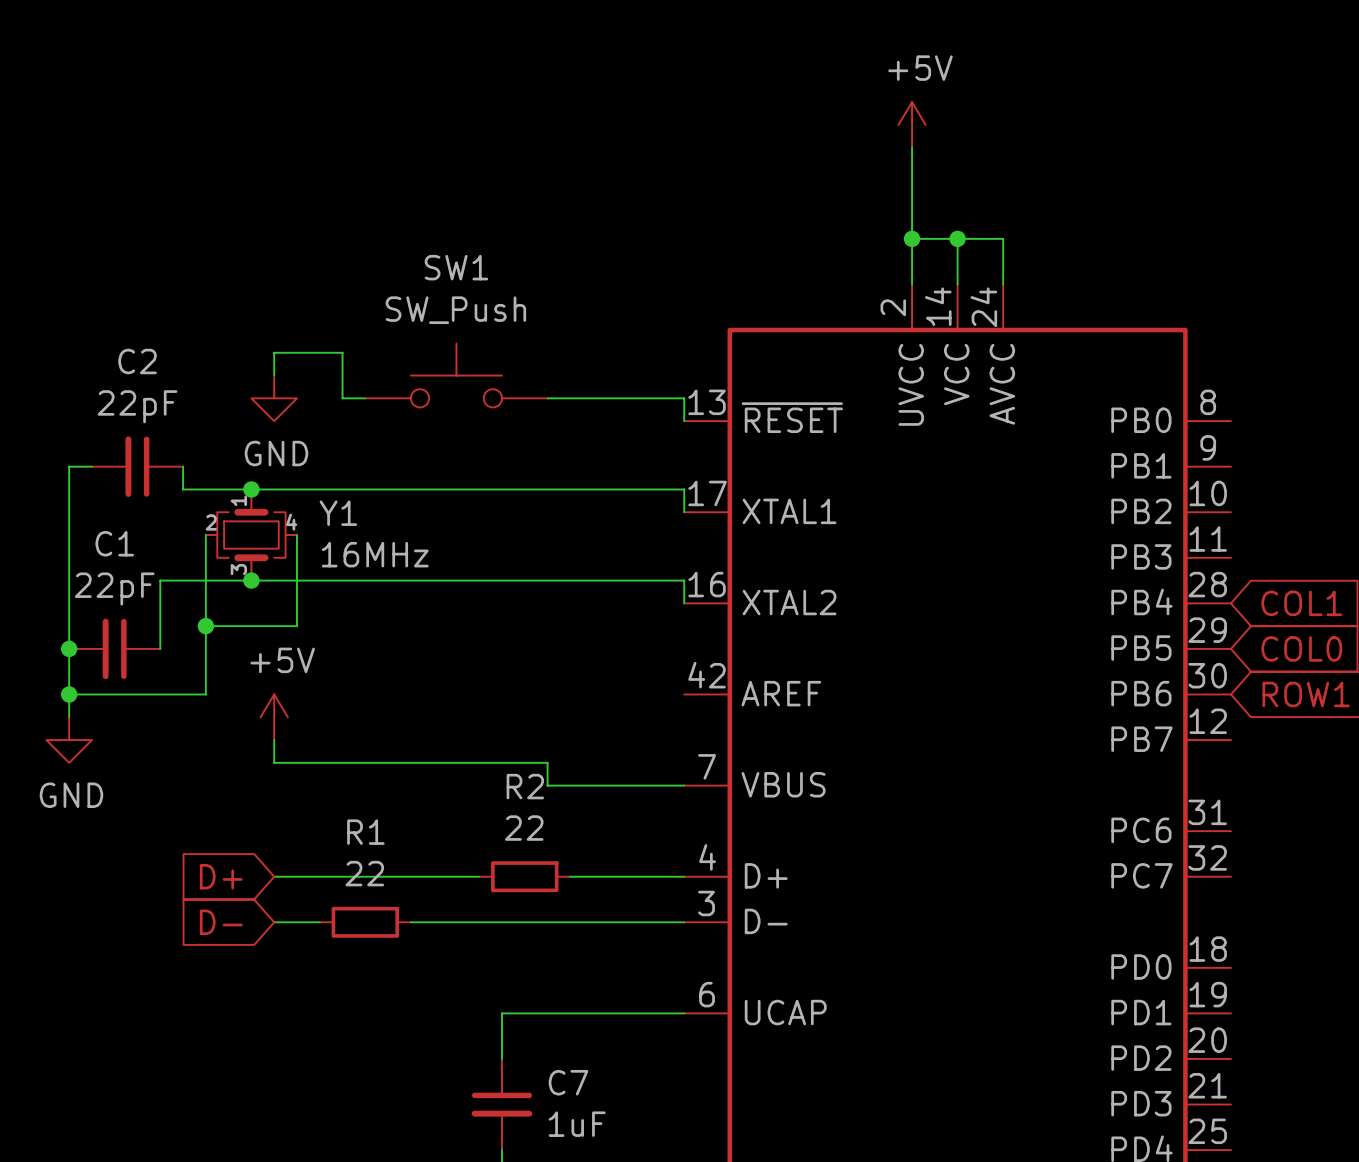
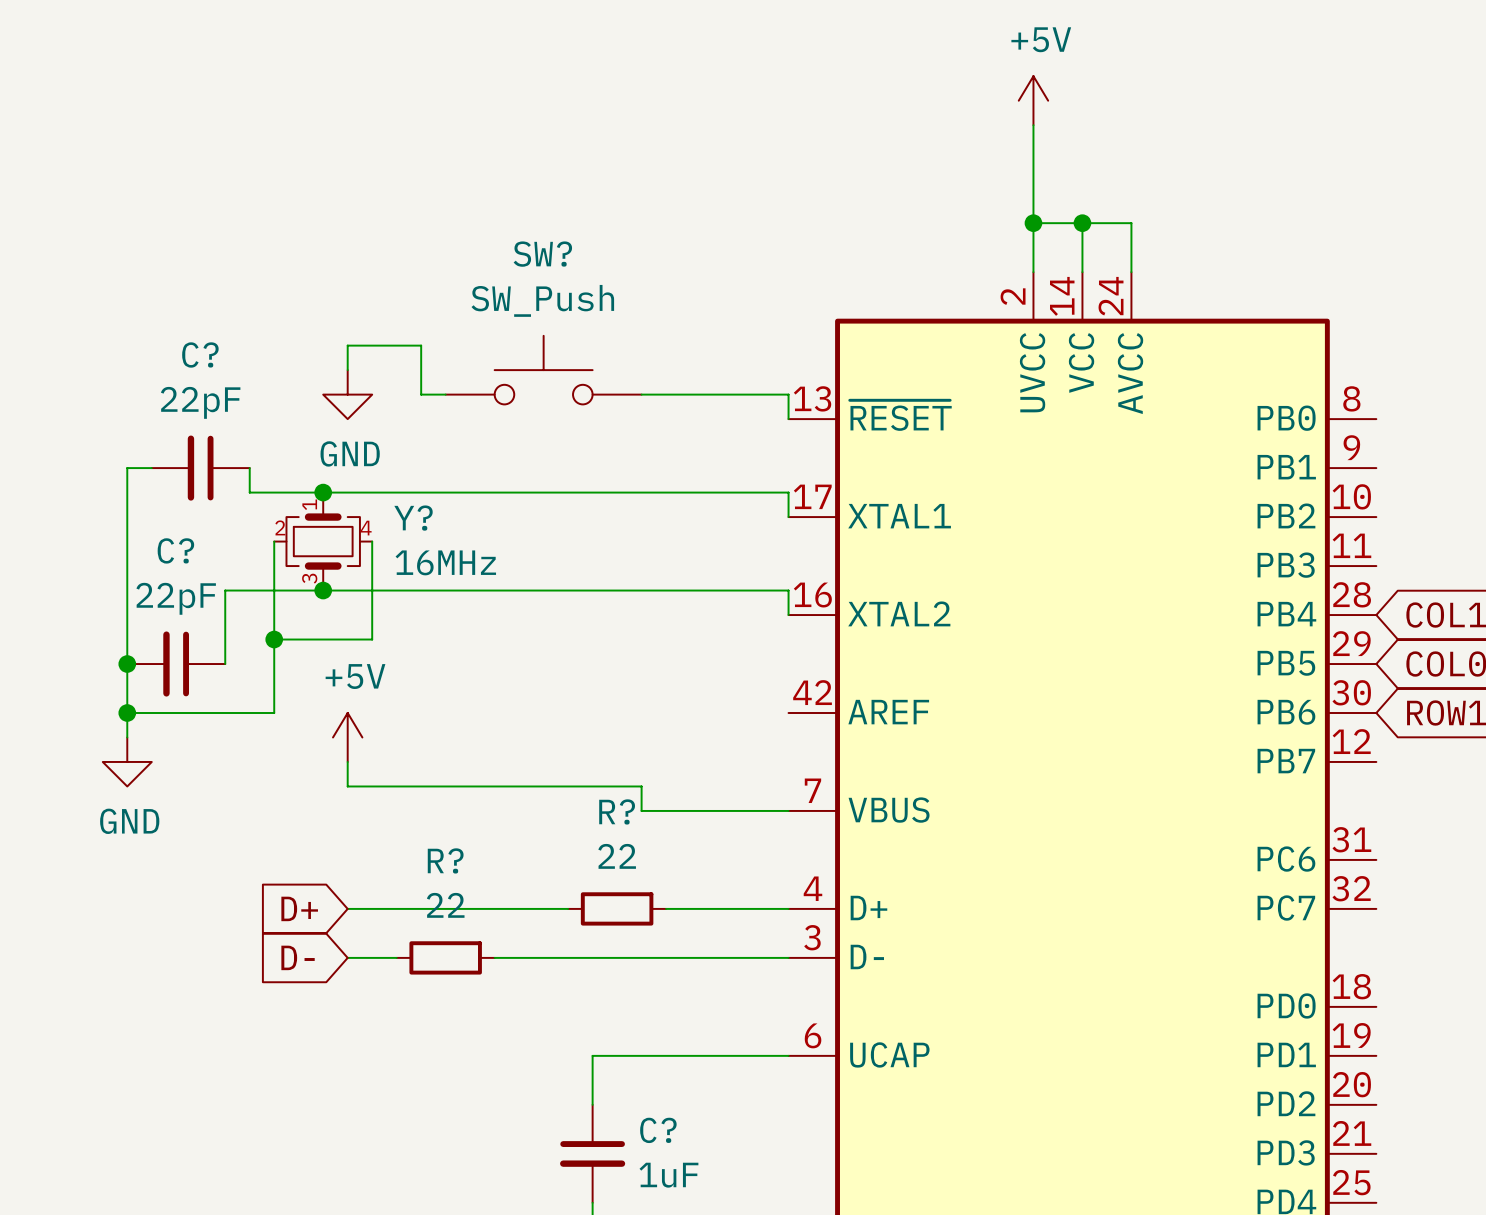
SW1 name: SW1 (456, 267) -> SW? (542, 254)
C2 name: C2 (137, 361) -> C? (200, 354)
Y1 name: Y1 (338, 513) -> Y? (413, 518)
C1 name: C1 (114, 543) -> C? (175, 550)
R2 name: R2 (525, 786) -> R? (617, 811)
R1 name: R1 (365, 832) -> R? (445, 860)
C7 name: C7 (568, 1082) -> C? (658, 1130)

